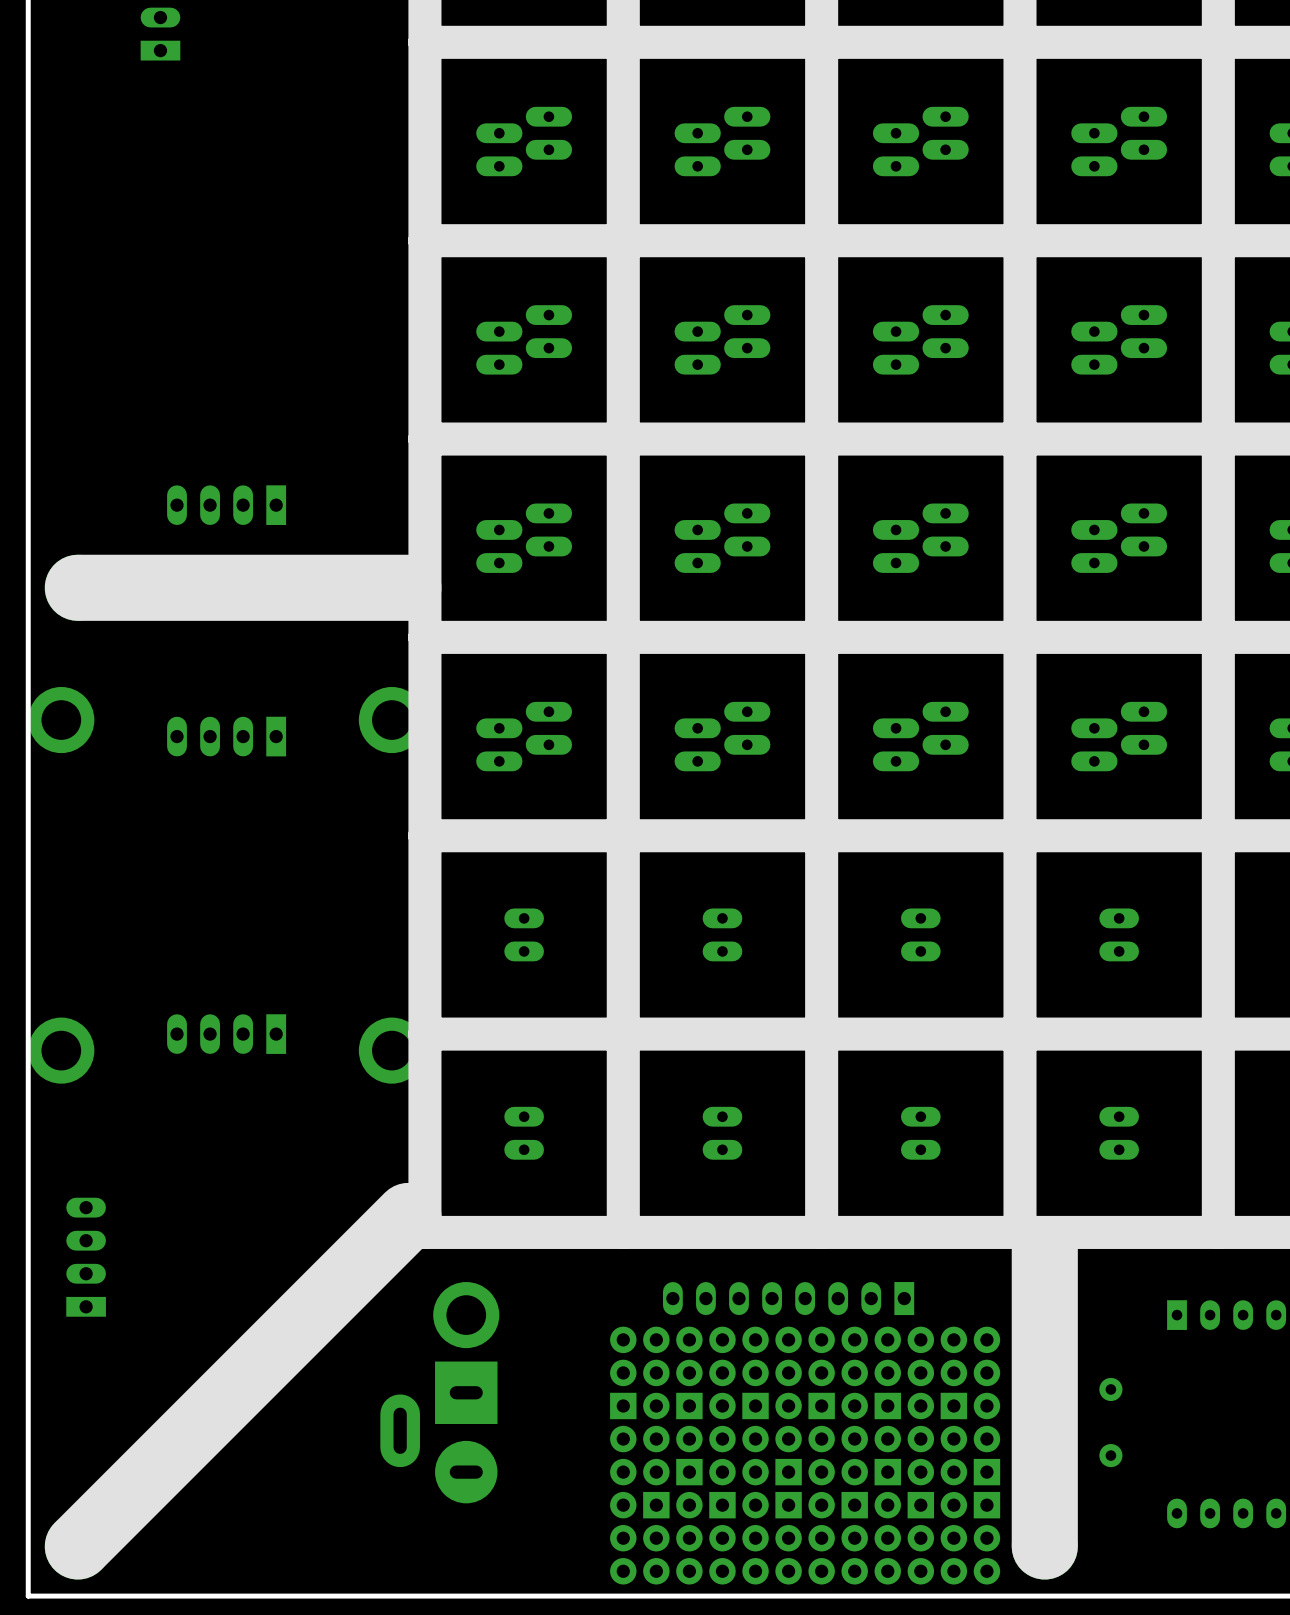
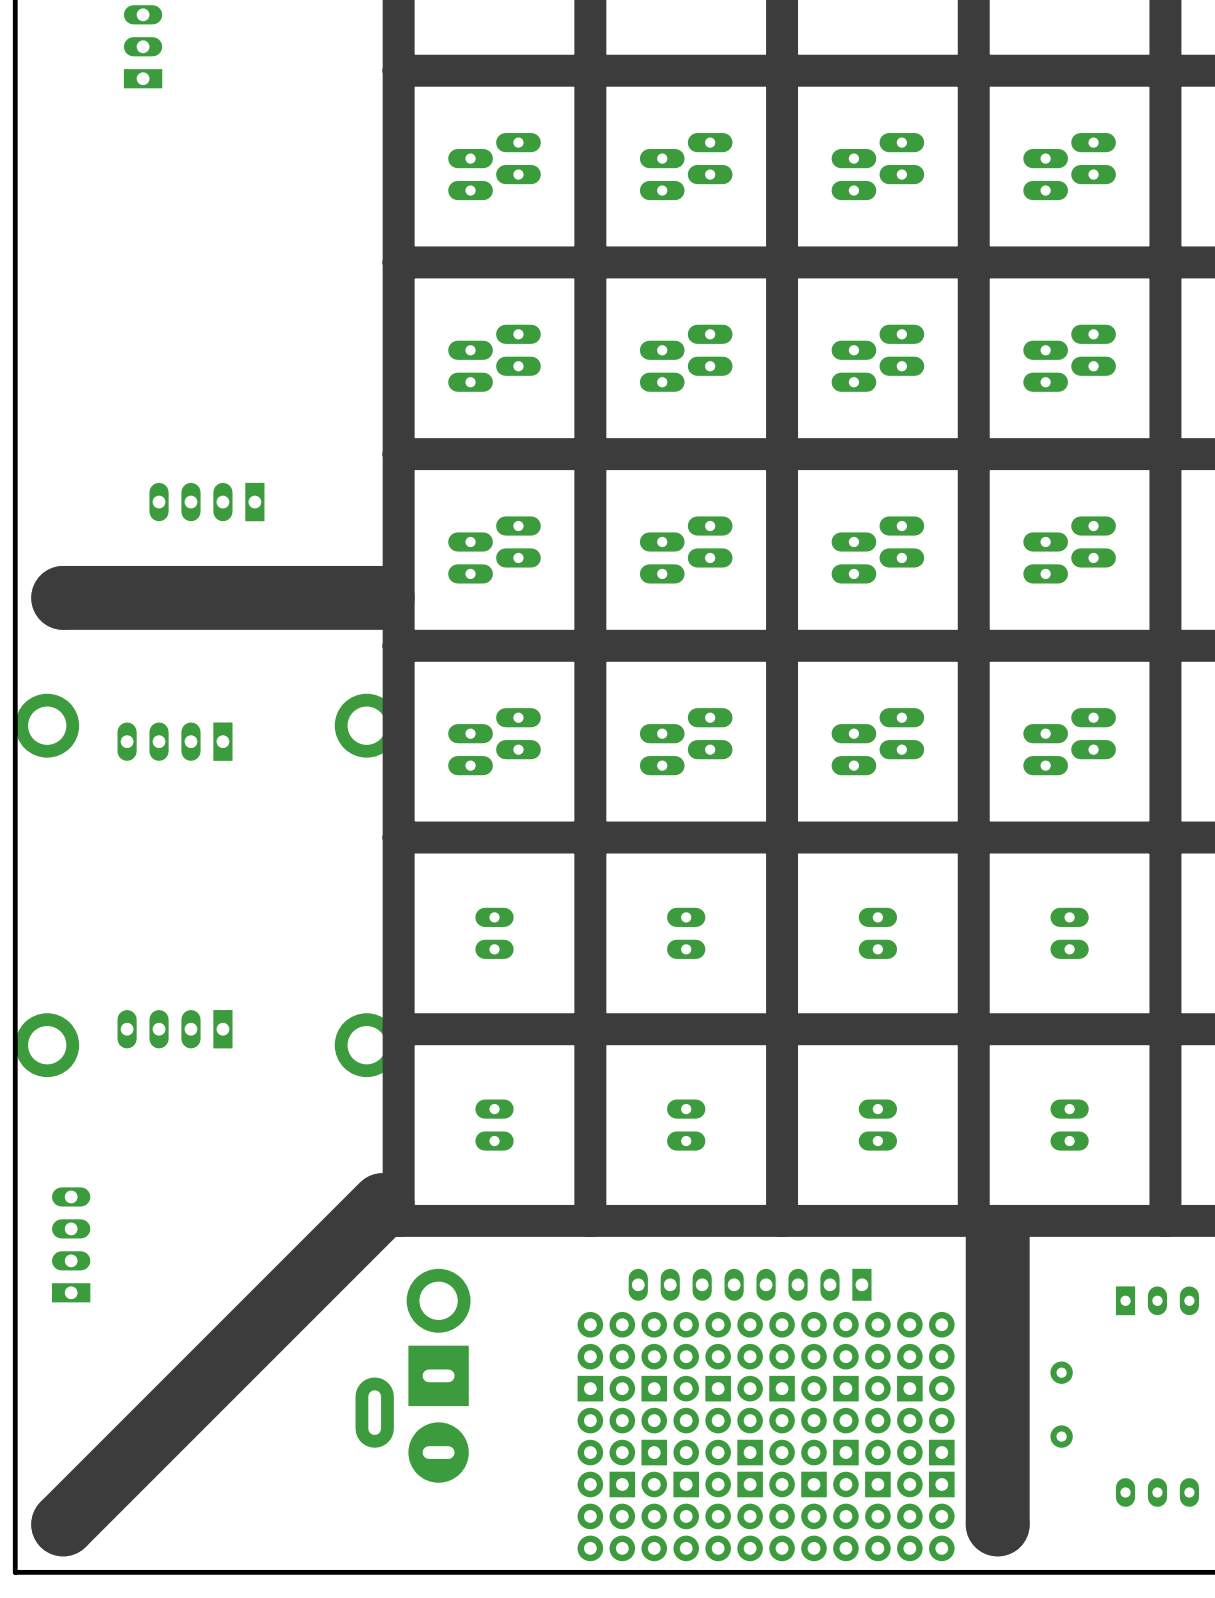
part position: (226, 505) -> (206, 502)
part position: (226, 736) -> (175, 741)
part position: (226, 1034) -> (175, 1029)

